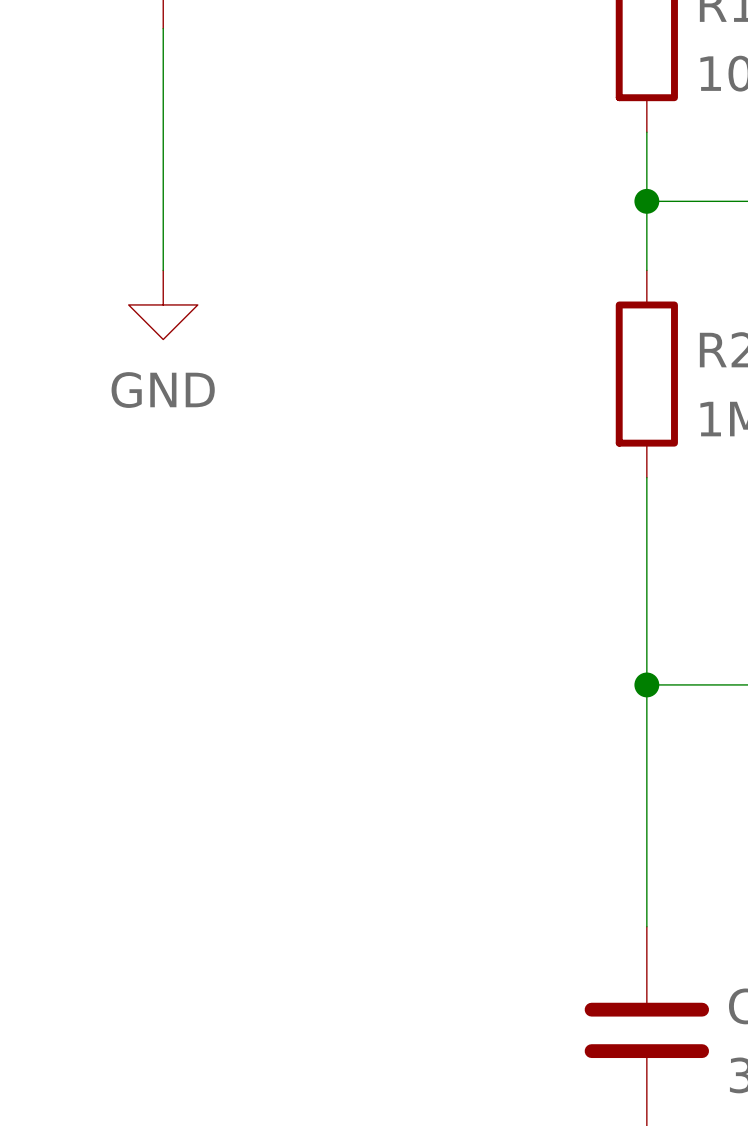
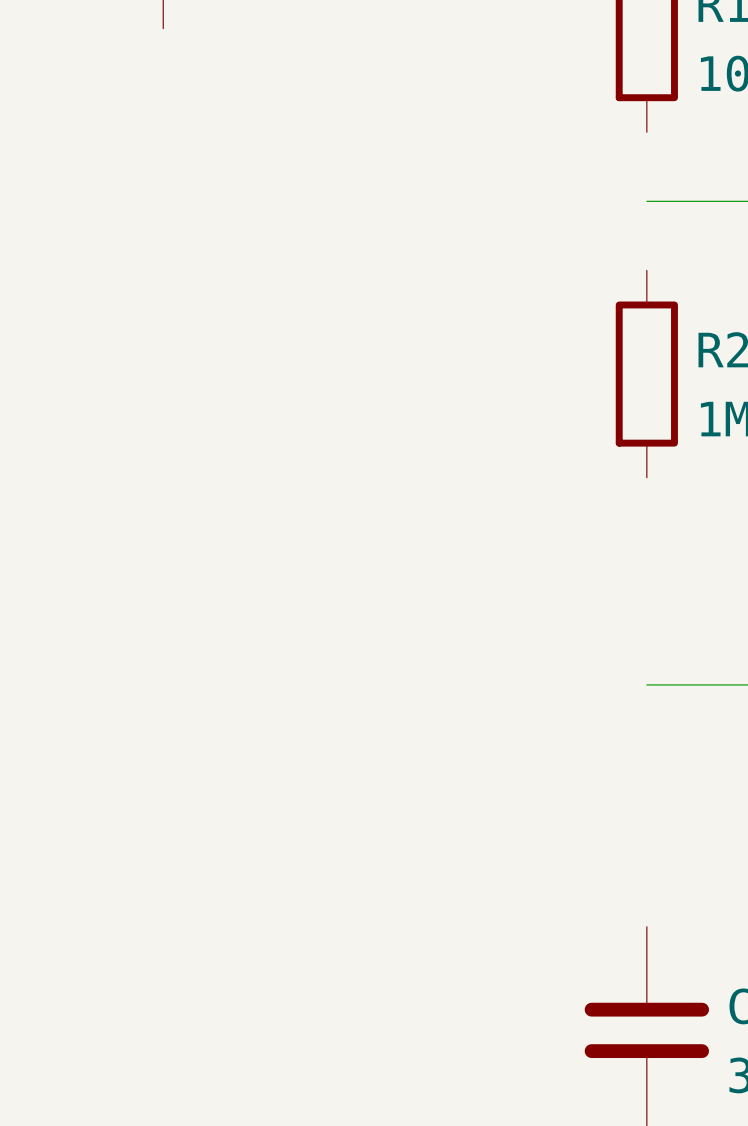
wire: (163, 28) (163, 270) -> none
wire: (646, 132) (646, 270) -> none
junction: (646, 201) -> none
power symbol: GND (163, 304) -> none
wire: (646, 477) (646, 926) -> none
junction: (646, 684) -> none

